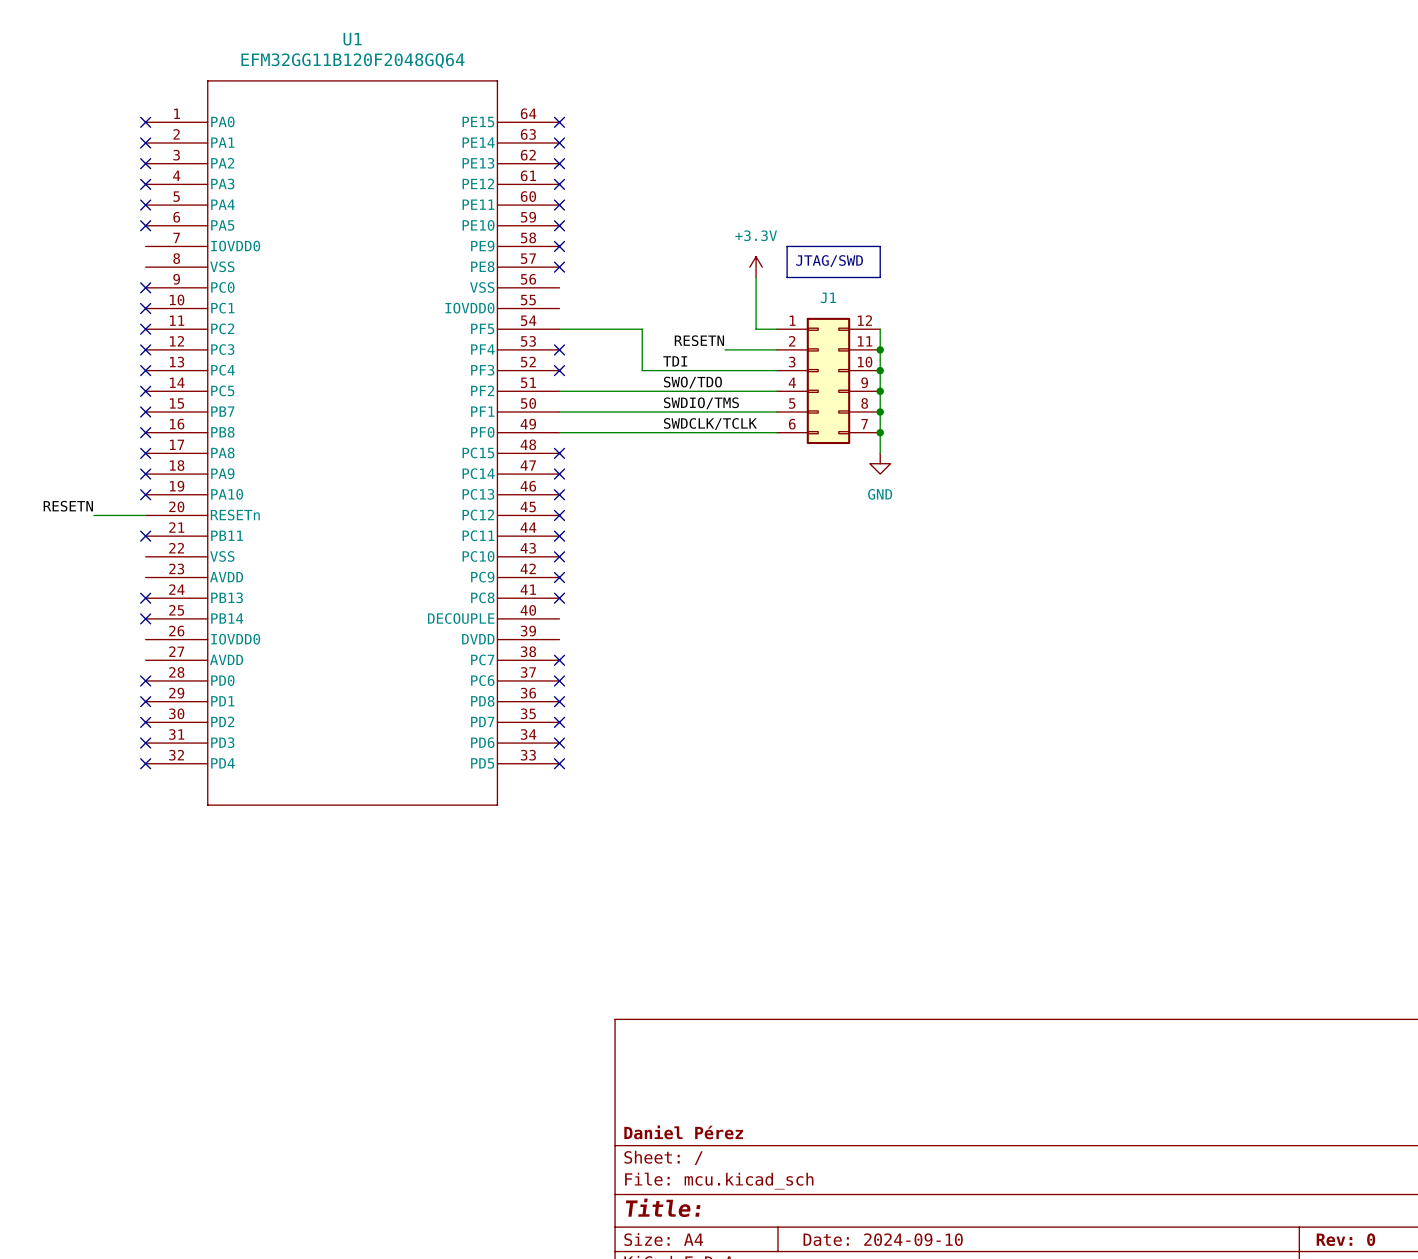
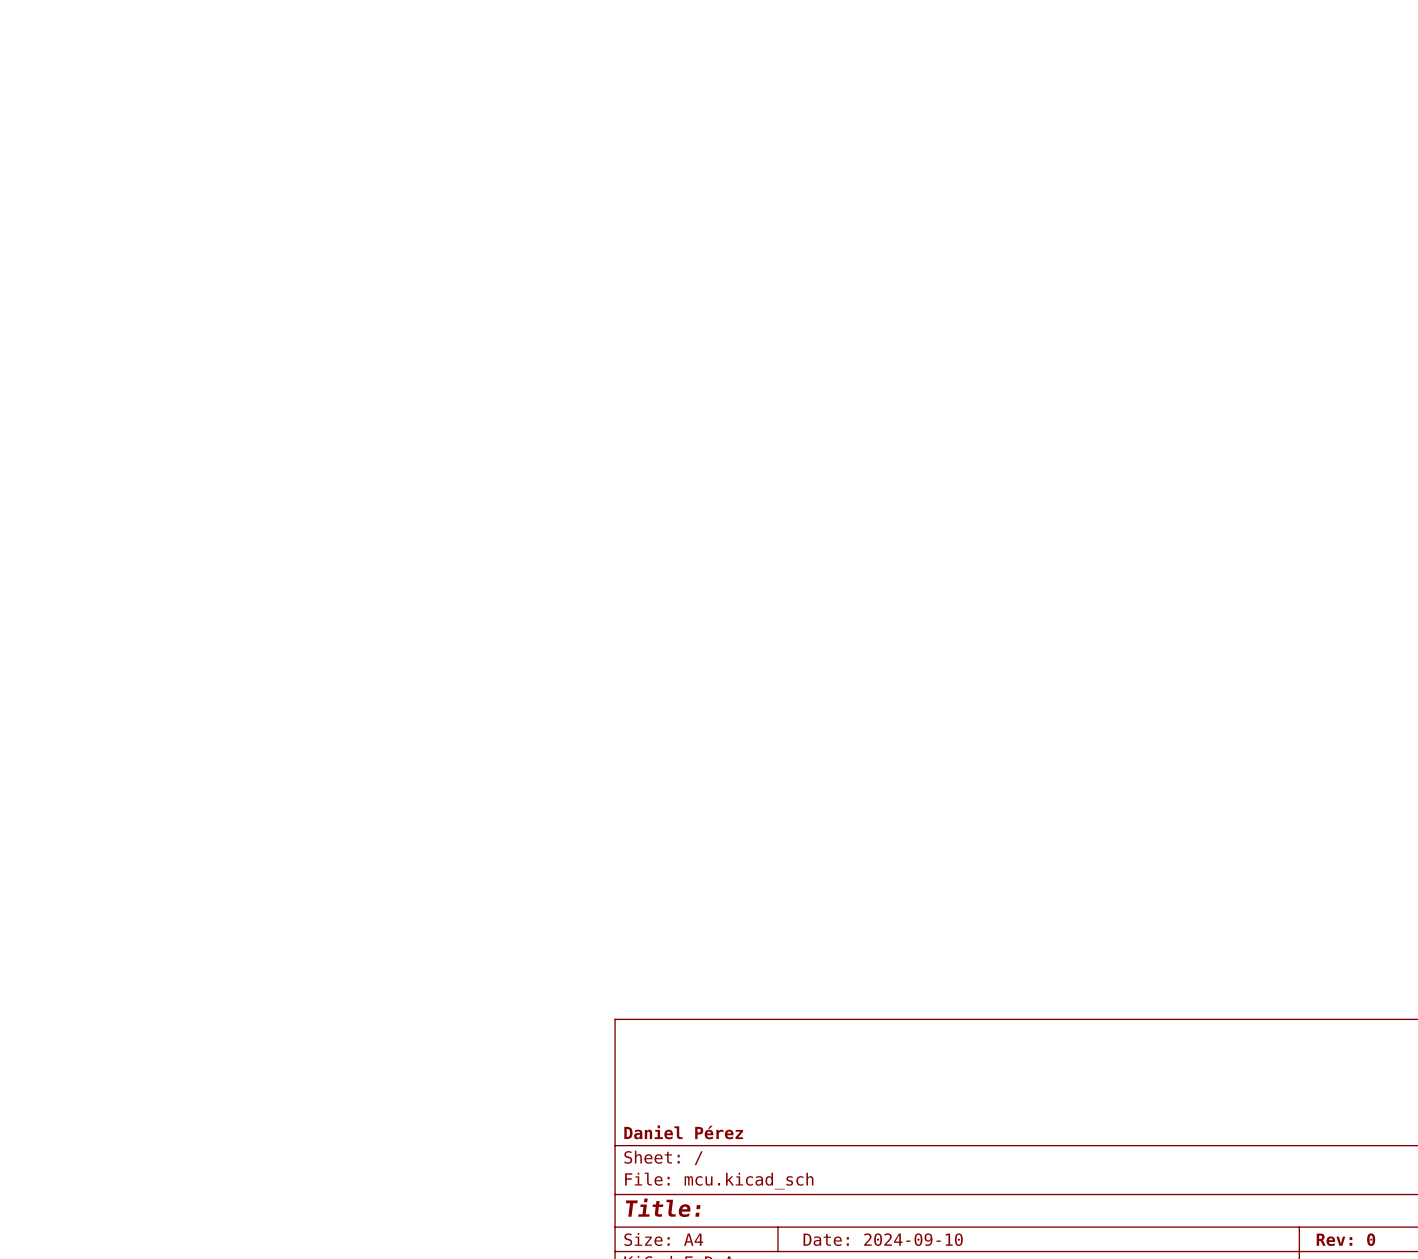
no-connect mark: (145, 122) -> none
no-connect mark: (559, 122) -> none
no-connect mark: (145, 142) -> none
no-connect mark: (559, 142) -> none
no-connect mark: (145, 163) -> none
no-connect mark: (559, 163) -> none
no-connect mark: (145, 184) -> none
no-connect mark: (559, 184) -> none
no-connect mark: (145, 205) -> none
no-connect mark: (559, 205) -> none
no-connect mark: (145, 225) -> none
no-connect mark: (559, 225) -> none
no-connect mark: (559, 246) -> none
line: (787, 246) (880, 246) (880, 277) (787, 277) (787, 246) -> none
text: JTAG/SWD (829, 261) -> none
no-connect mark: (559, 267) -> none
power symbol: +3.3V (756, 267) -> none
wire: (756, 277) (756, 329) (776, 329) -> none
no-connect mark: (145, 287) -> none
no-connect mark: (145, 308) -> none
no-connect mark: (145, 329) -> none
wire: (559, 329) (642, 329) (642, 370) (776, 370) -> none
wire: (880, 329) (880, 453) -> none
label: RESETN (699, 340) -> none
no-connect mark: (145, 349) -> none
no-connect mark: (559, 349) -> none
wire: (725, 349) (776, 349) -> none
junction: (880, 349) -> none
label: TDI (675, 361) -> none
no-connect mark: (145, 370) -> none
no-connect mark: (559, 370) -> none
junction: (880, 370) -> none
J1: (828, 380) -> none
label: SWO/TDO (692, 382) -> none
no-connect mark: (145, 391) -> none
wire: (559, 391) (776, 391) -> none
junction: (880, 391) -> none
label: SWDIO/TMS (701, 403) -> none
no-connect mark: (145, 411) -> none
wire: (559, 411) (776, 411) -> none
junction: (880, 411) -> none
label: SWDCLK/TCLK (710, 424) -> none
no-connect mark: (145, 432) -> none
wire: (559, 432) (776, 432) -> none
junction: (880, 432) -> none
U1: EFM32GG11B120F2048GQ64 (352, 443) -> none
no-connect mark: (145, 453) -> none
no-connect mark: (559, 453) -> none
power symbol: GND (880, 463) -> none
no-connect mark: (145, 474) -> none
no-connect mark: (559, 474) -> none
no-connect mark: (145, 494) -> none
no-connect mark: (559, 494) -> none
label: RESETN (68, 506) -> none
wire: (93, 515) (145, 515) -> none
no-connect mark: (559, 515) -> none
no-connect mark: (145, 536) -> none
no-connect mark: (559, 536) -> none
no-connect mark: (559, 556) -> none
no-connect mark: (559, 577) -> none
no-connect mark: (145, 598) -> none
no-connect mark: (559, 598) -> none
no-connect mark: (145, 618) -> none
no-connect mark: (559, 660) -> none
no-connect mark: (145, 680) -> none
no-connect mark: (559, 680) -> none
no-connect mark: (145, 701) -> none
no-connect mark: (559, 701) -> none
no-connect mark: (145, 722) -> none
no-connect mark: (559, 722) -> none
no-connect mark: (145, 743) -> none
no-connect mark: (559, 743) -> none
no-connect mark: (145, 763) -> none
no-connect mark: (559, 763) -> none

